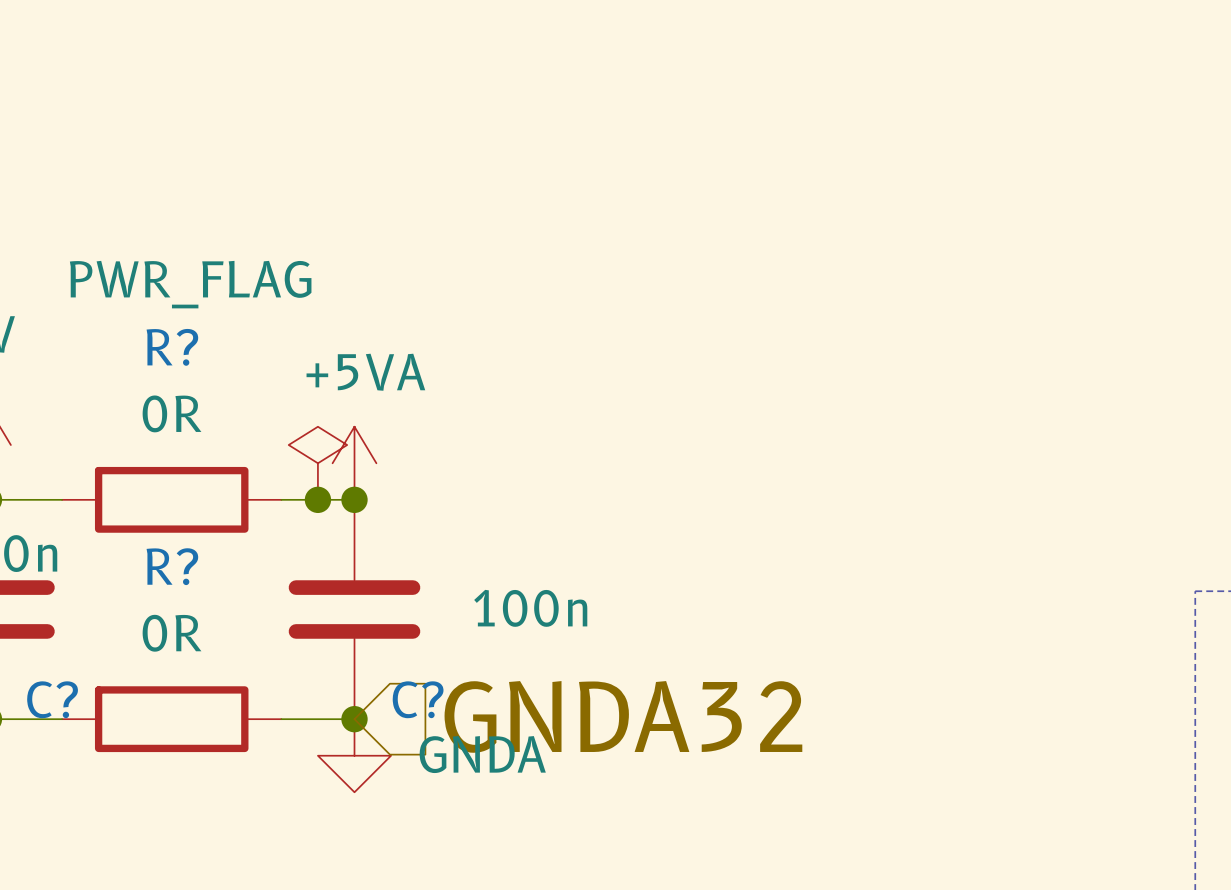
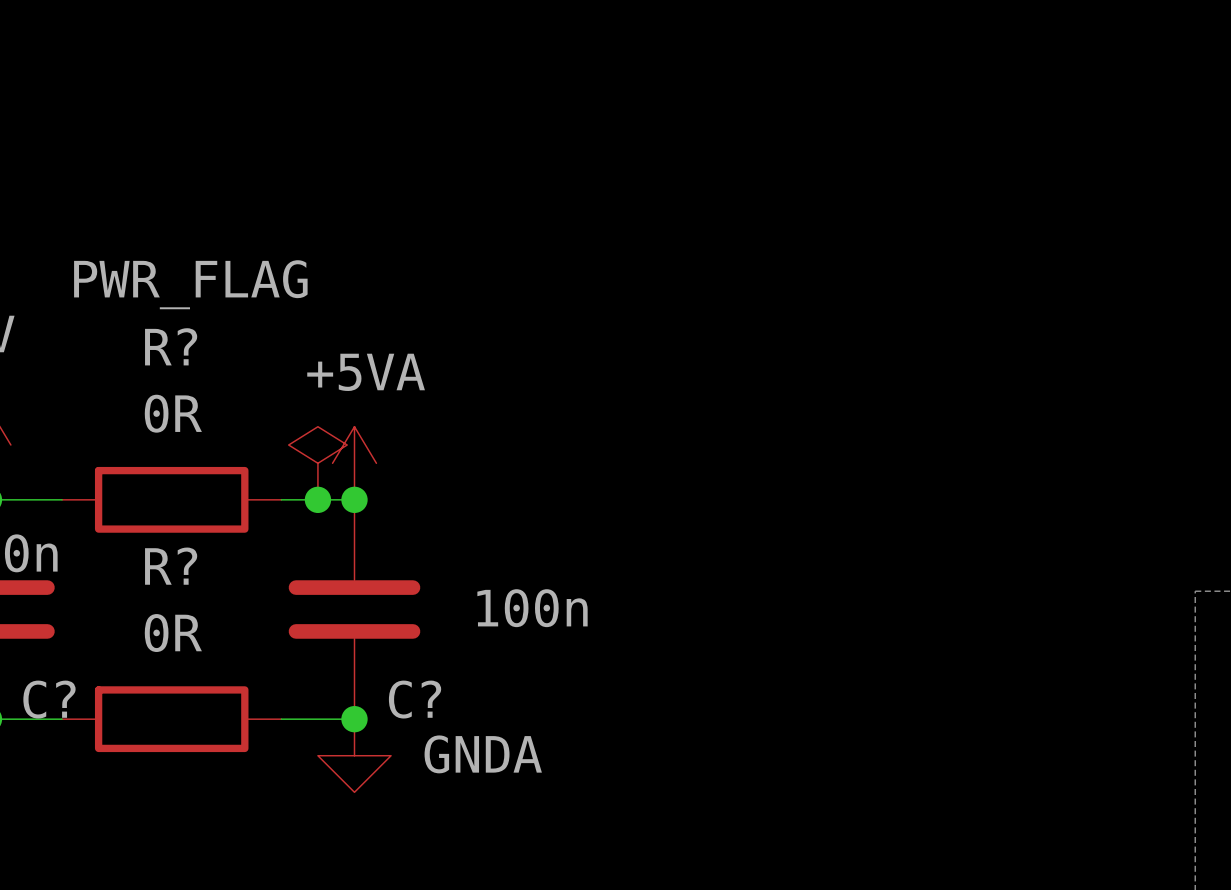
hierarchical label: GNDA32 (623, 716) -> none

